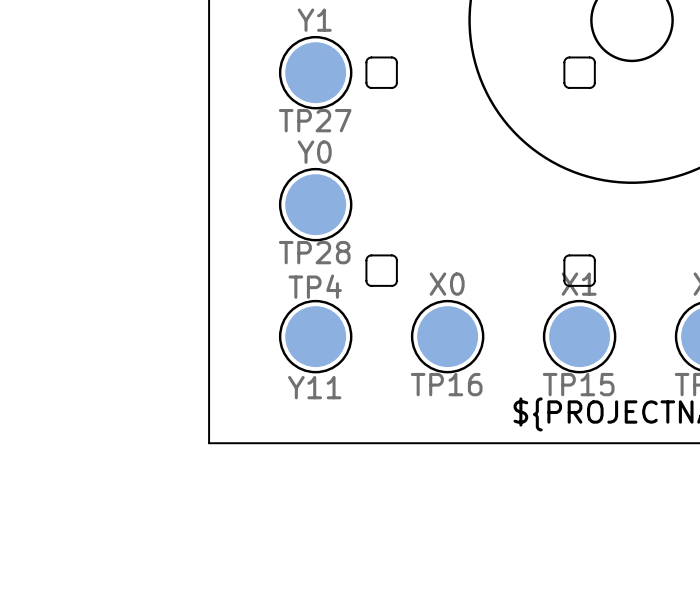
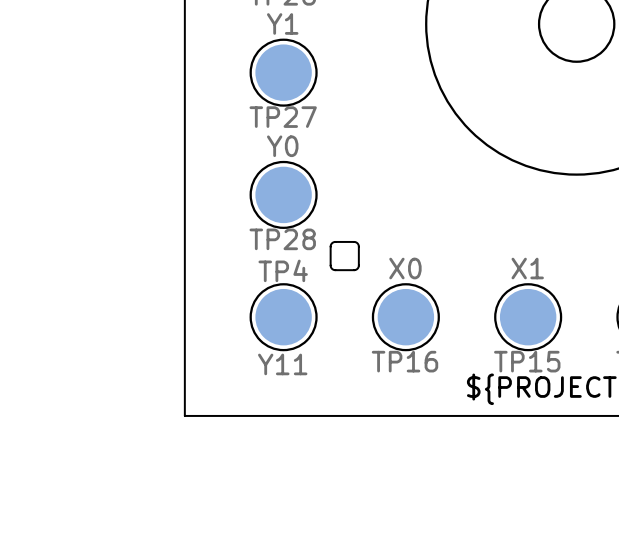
board edge: (391, 57) (370, 57) (367, 59) (366, 82) (368, 86) (391, 87) (395, 86) (396, 61) (391, 57) -> none
board edge: (589, 57) (568, 57) (565, 59) (564, 82) (566, 86) (589, 87) (593, 86) (594, 61) (589, 57) -> none
board edge: (589, 255) (568, 255) (565, 257) (564, 280) (566, 284) (589, 285) (593, 283) (594, 259) (589, 255) -> none

